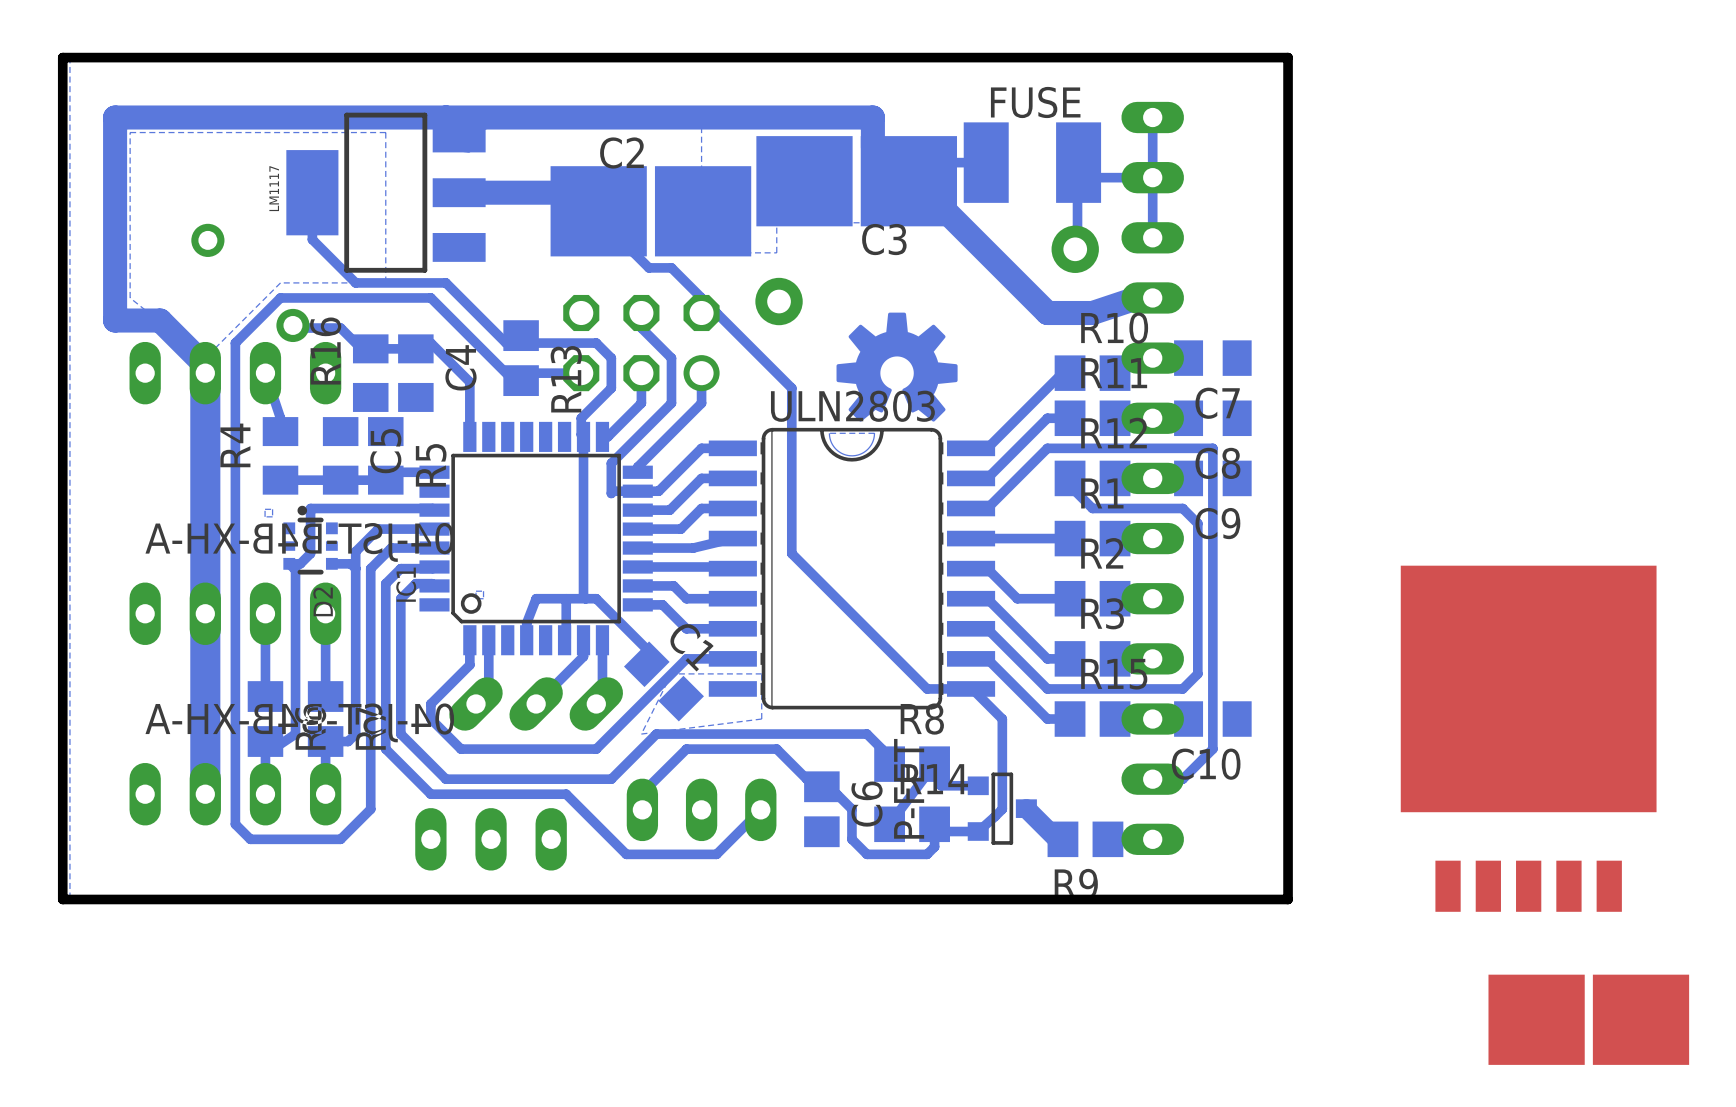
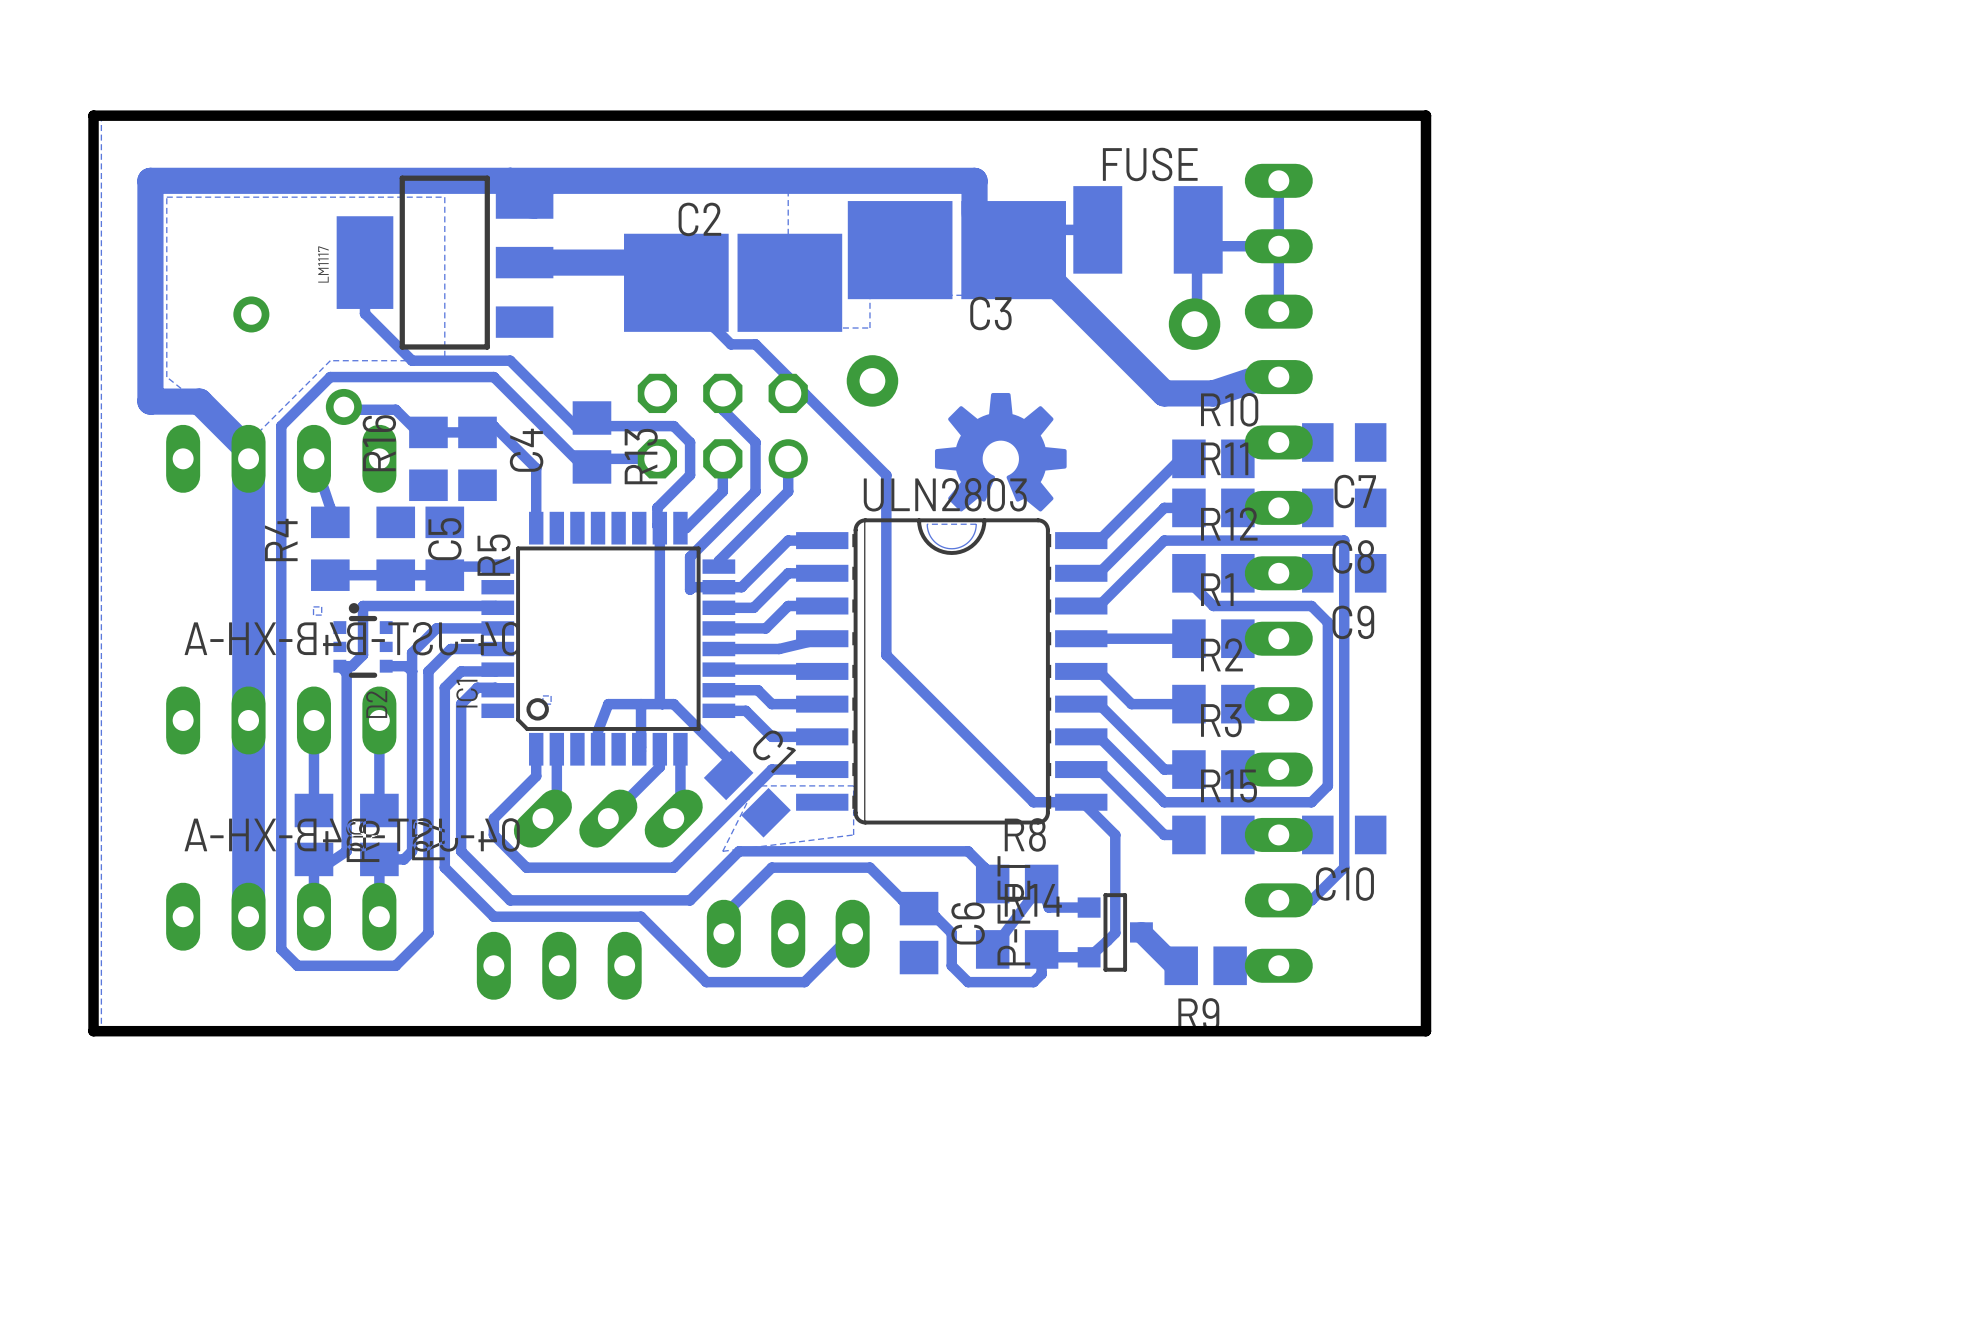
part: (1528, 738) -> none
part: (1588, 1019) -> none

